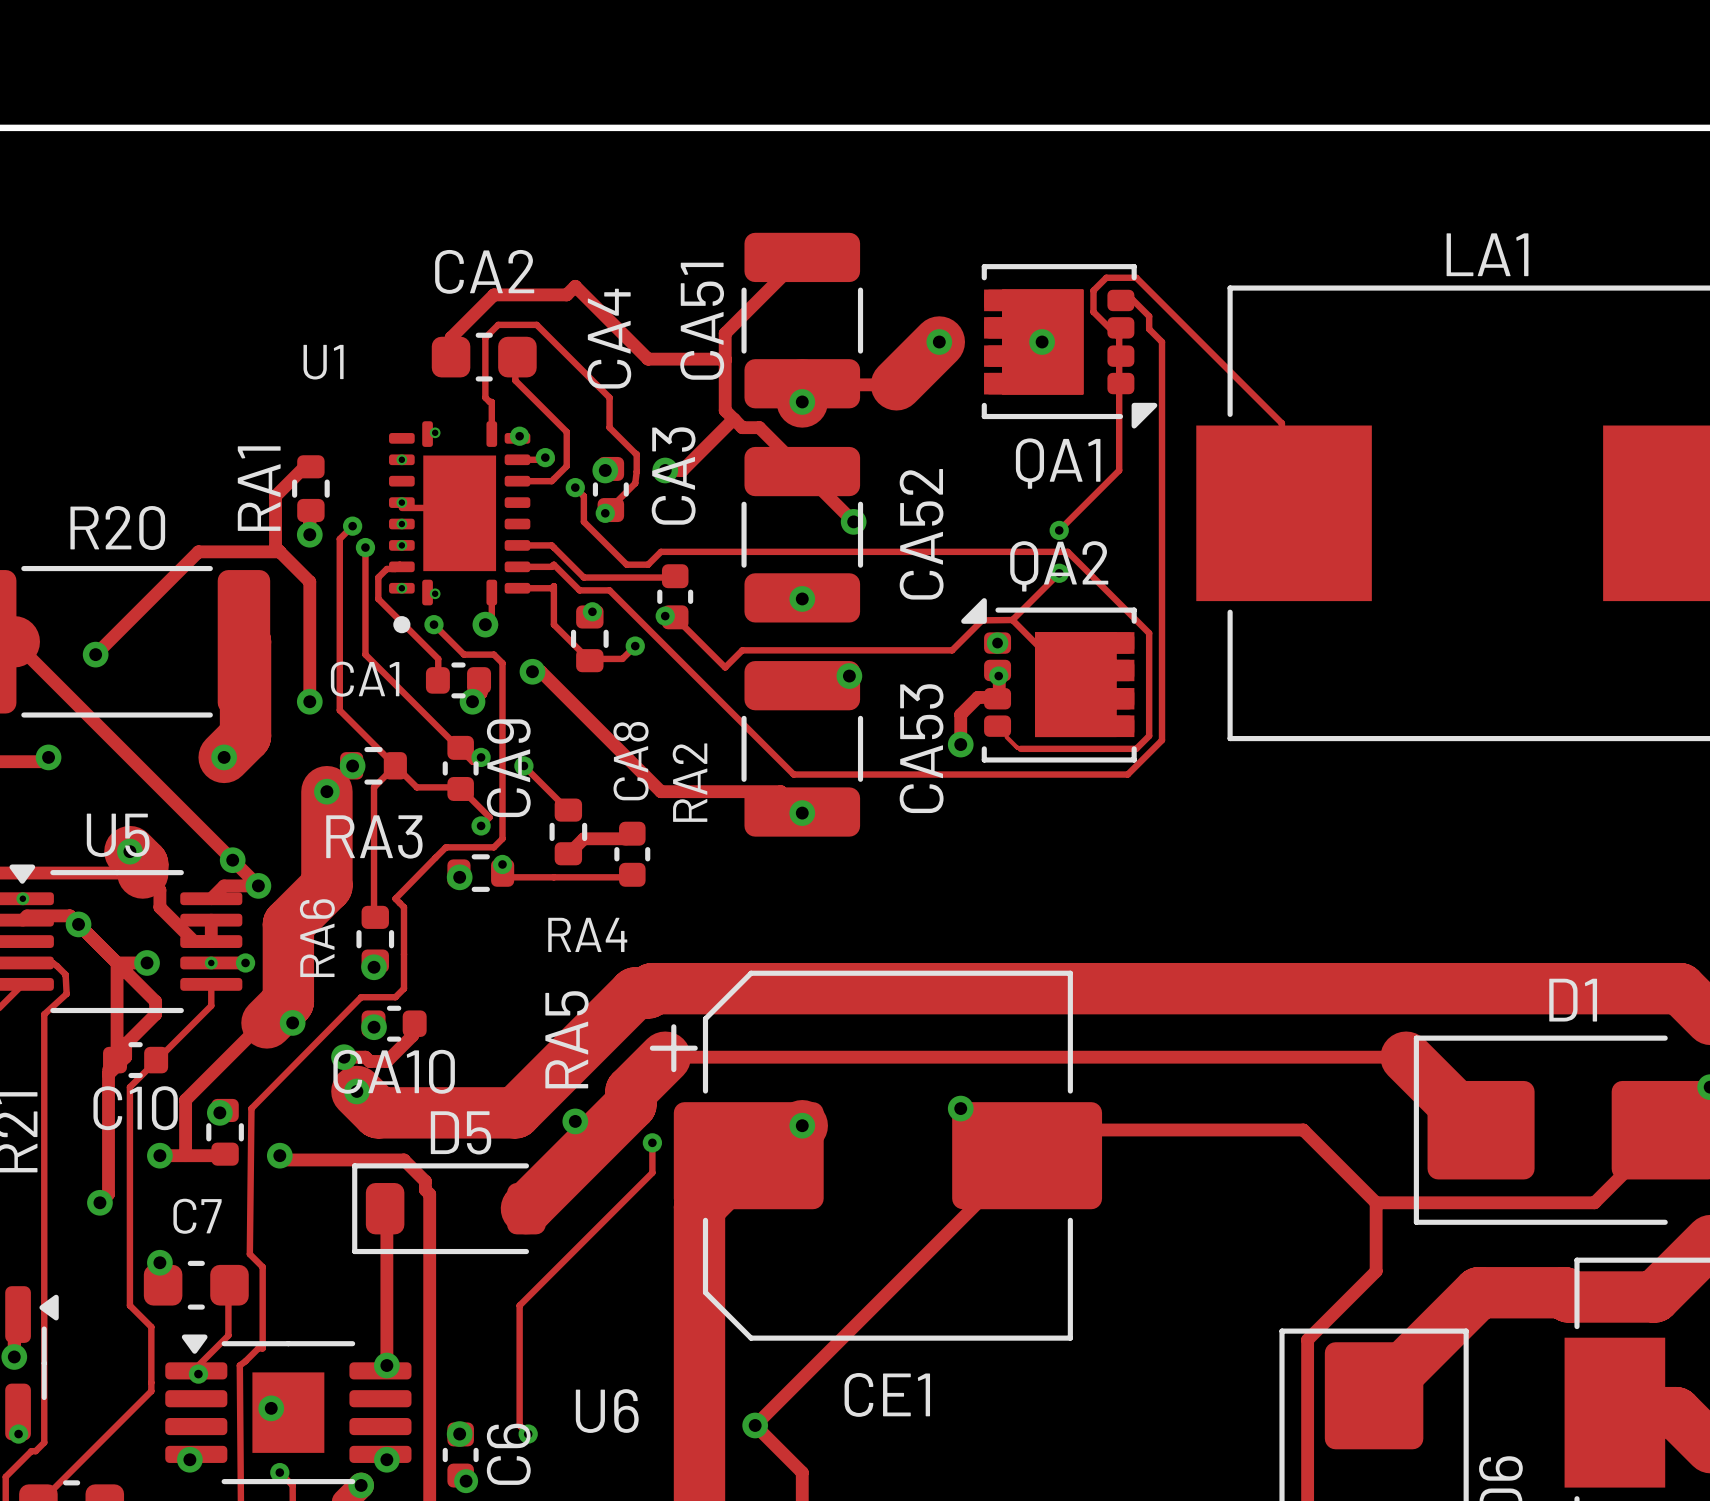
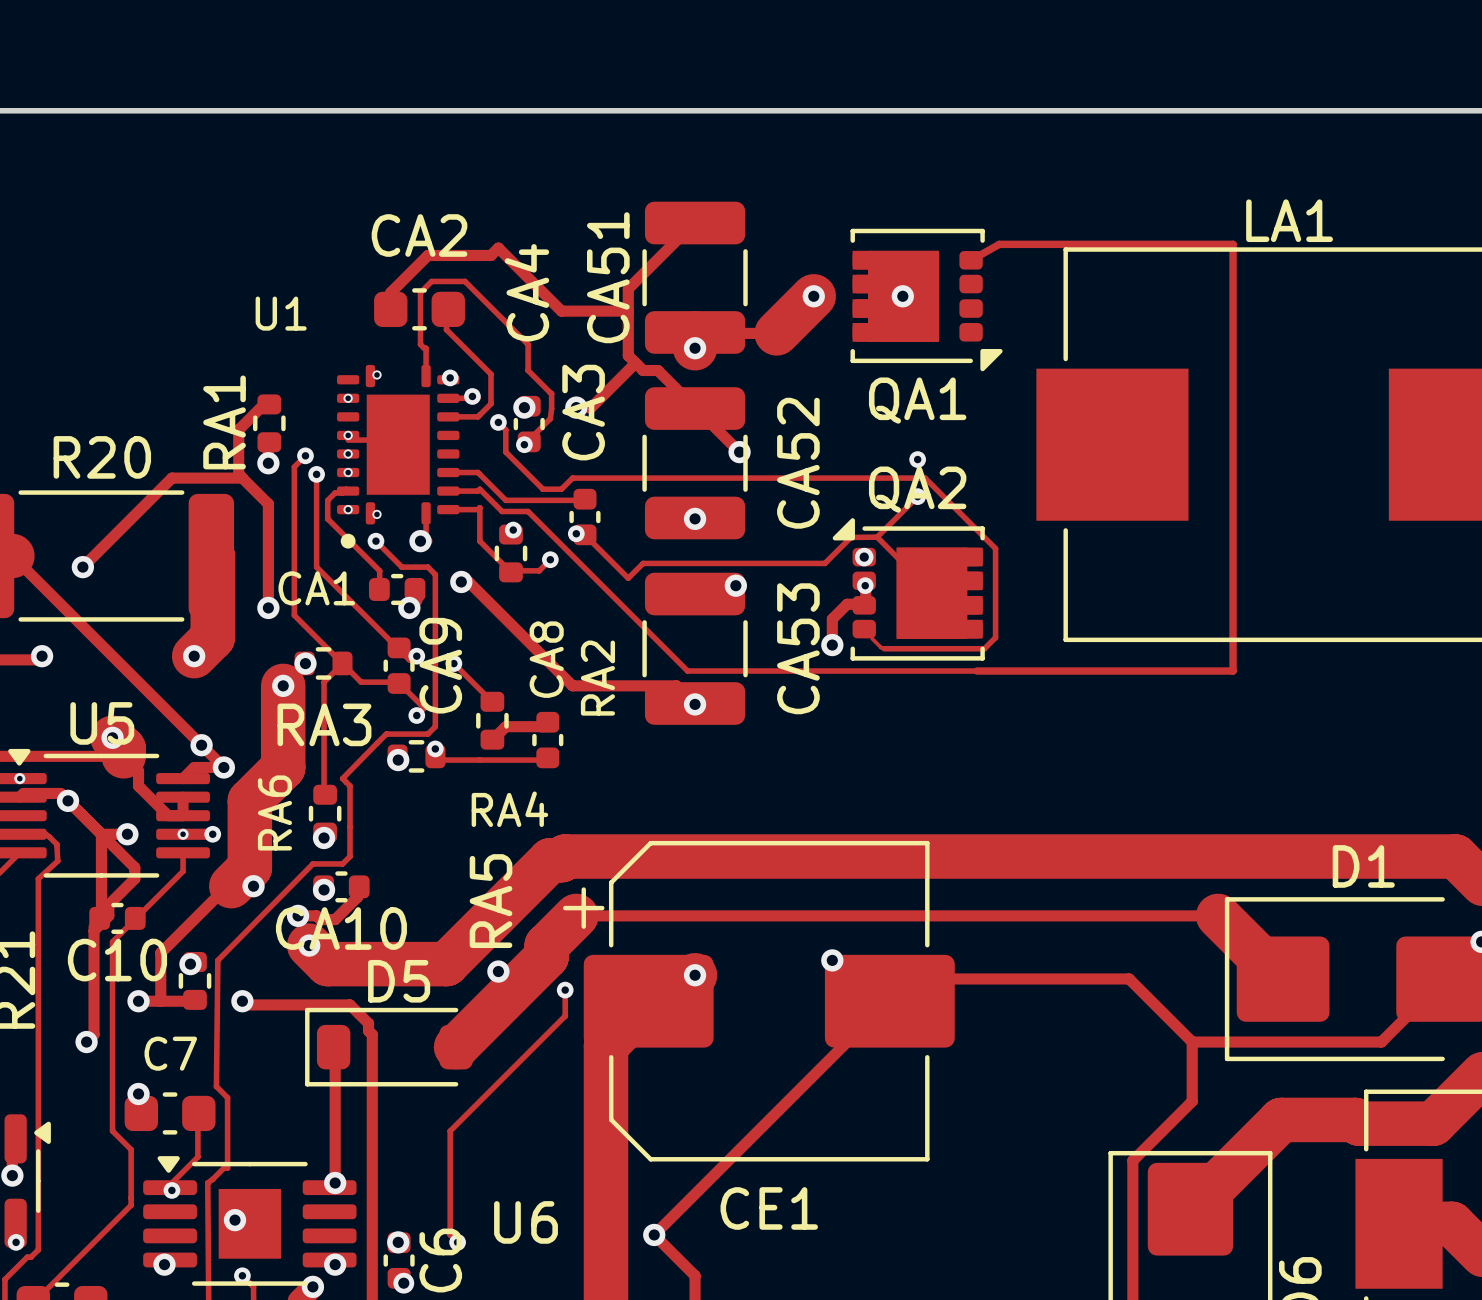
track: (1120, 300) (1119, 299) (1132, 299) (1149, 316) (1149, 329) (1162, 342) (1162, 740) (1127, 774) -> (971, 260) (999, 244) (1233, 244) (1233, 671) (977, 671)
track: (1284, 513) (1281, 513) (1281, 423) (1136, 277) (1106, 277) (1093, 290) (1093, 312) (1119, 337) (1119, 470) (1059, 530) -> none

